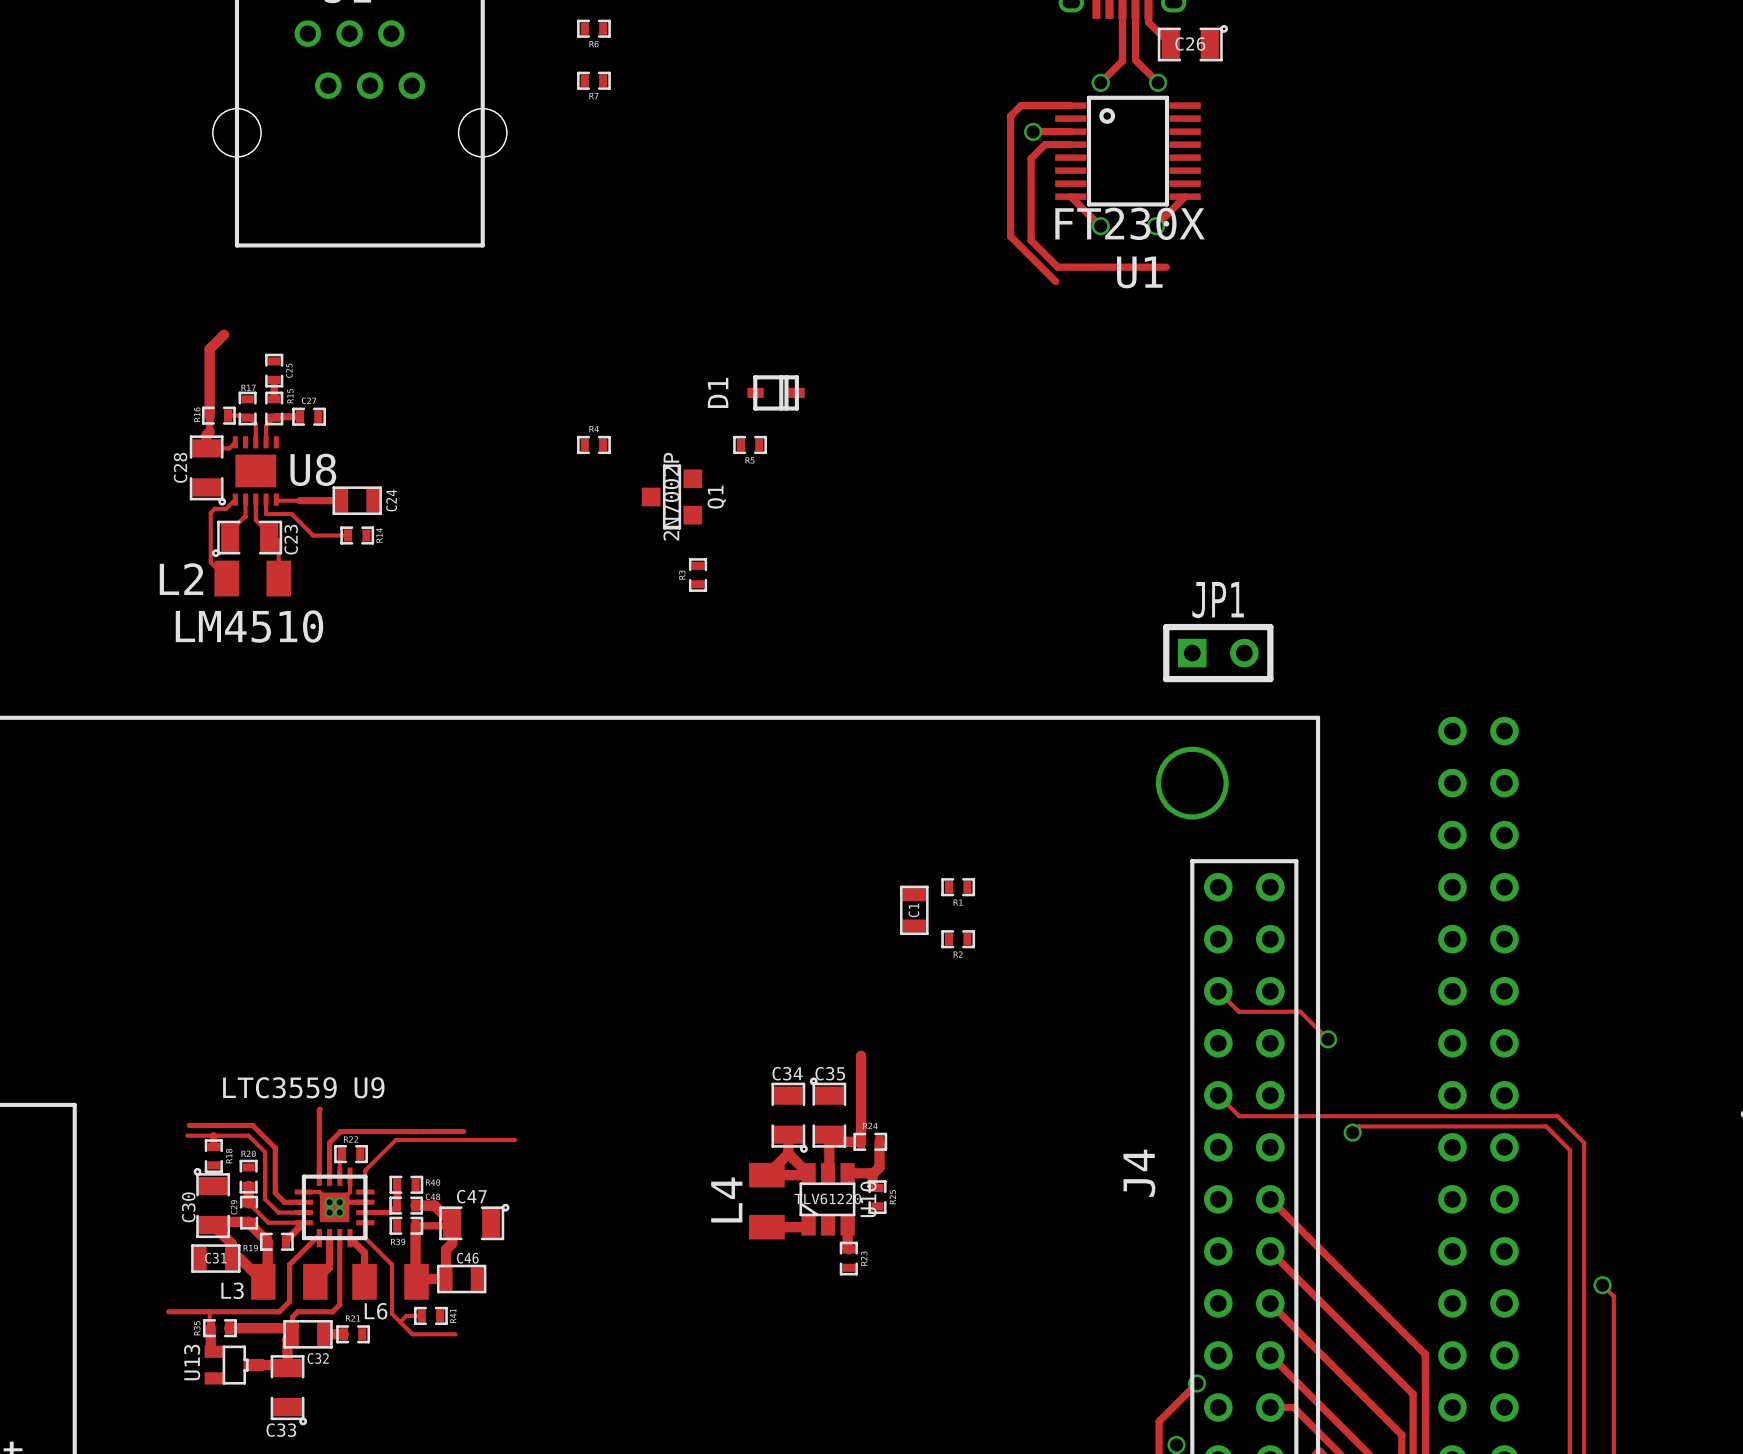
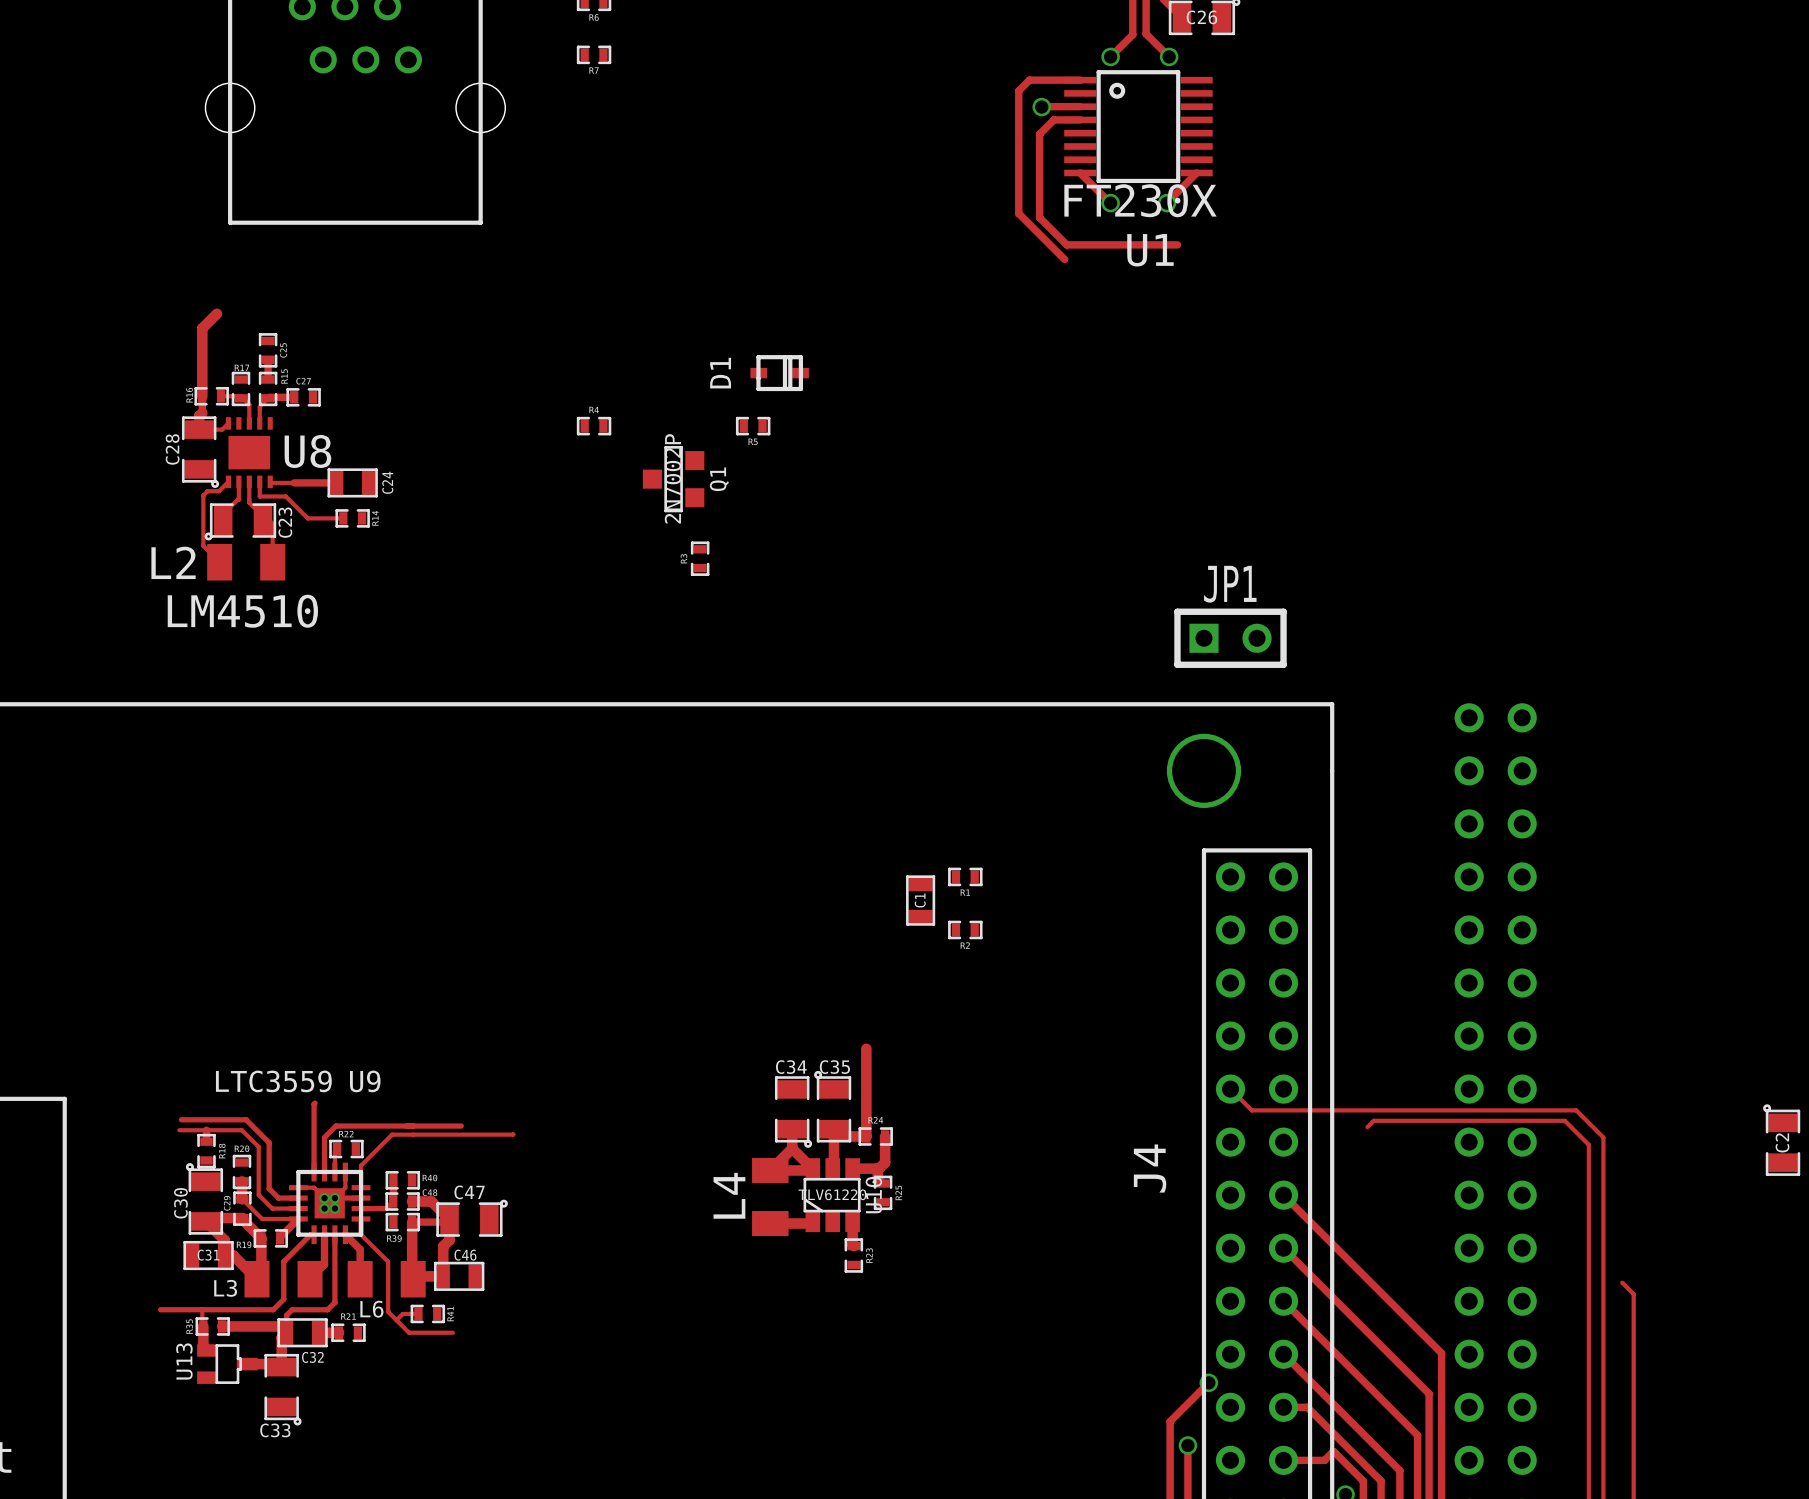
track: (1218, 991) (1238, 1011) (1300, 1011) (1328, 1039) -> none
via: (1328, 1039) -> none
via: (1352, 1132) -> none
via: (1602, 1285) -> none

